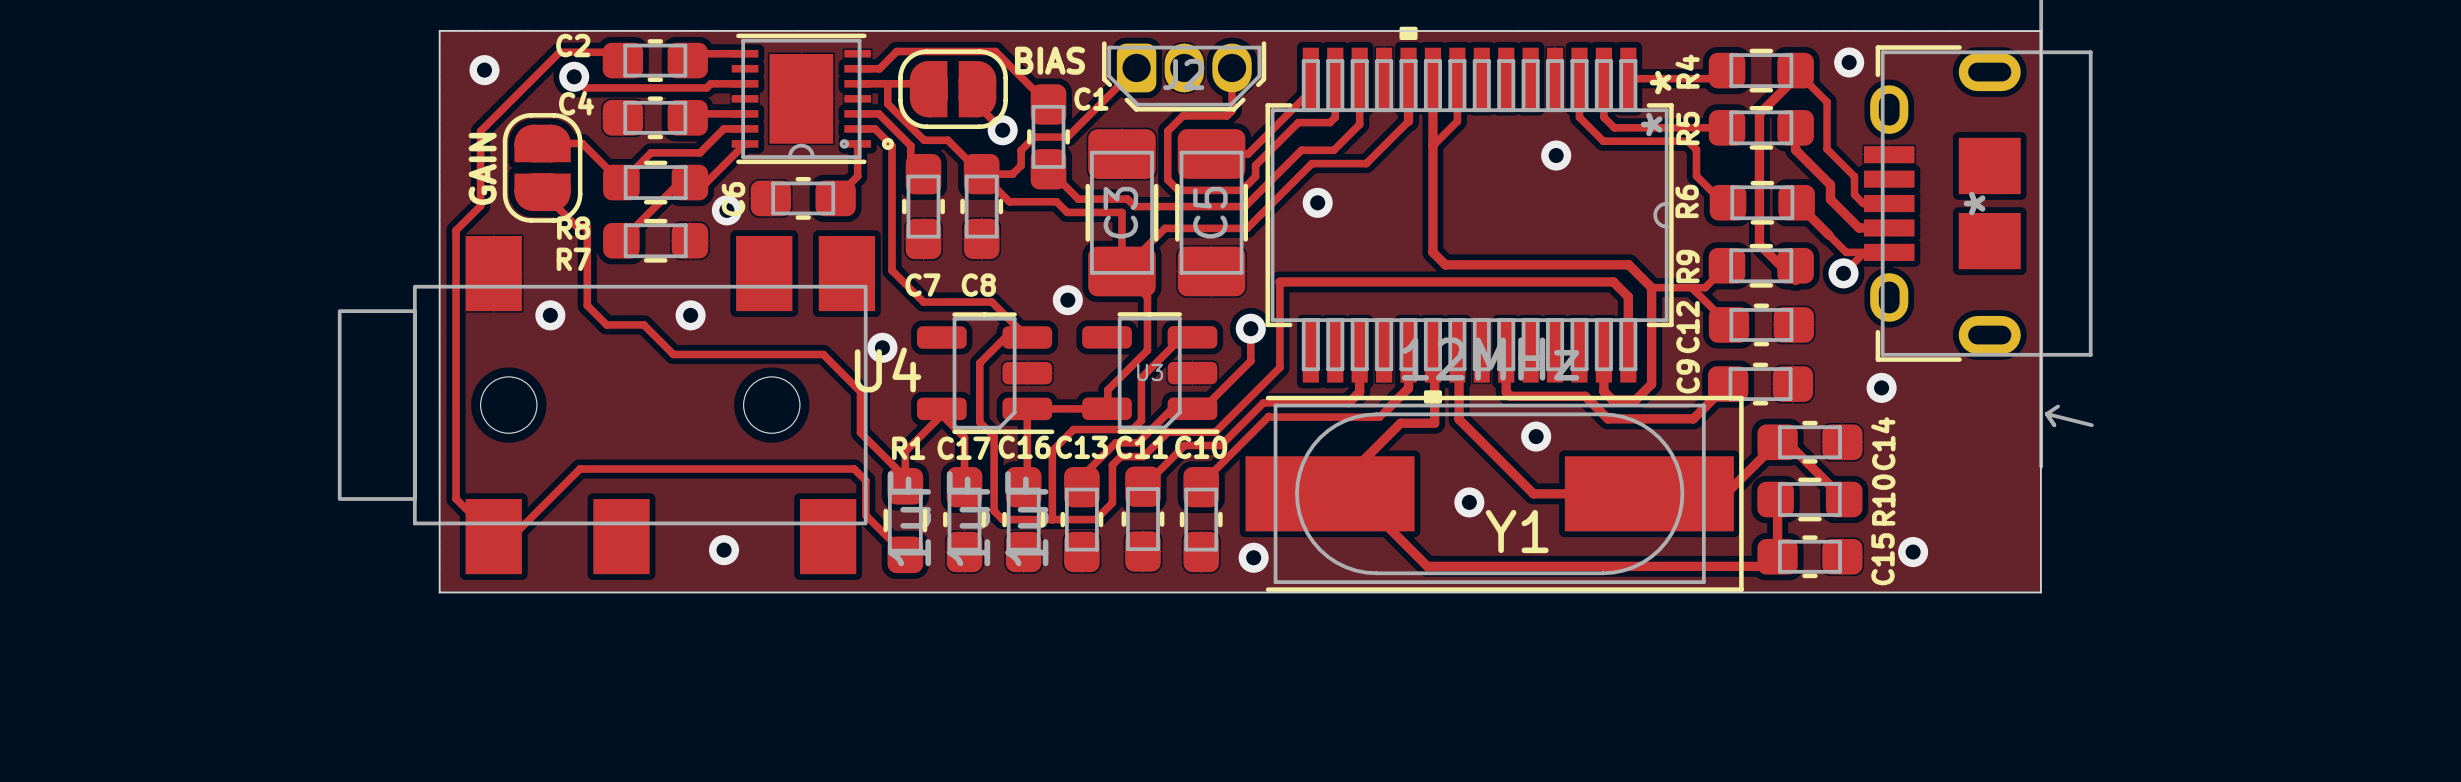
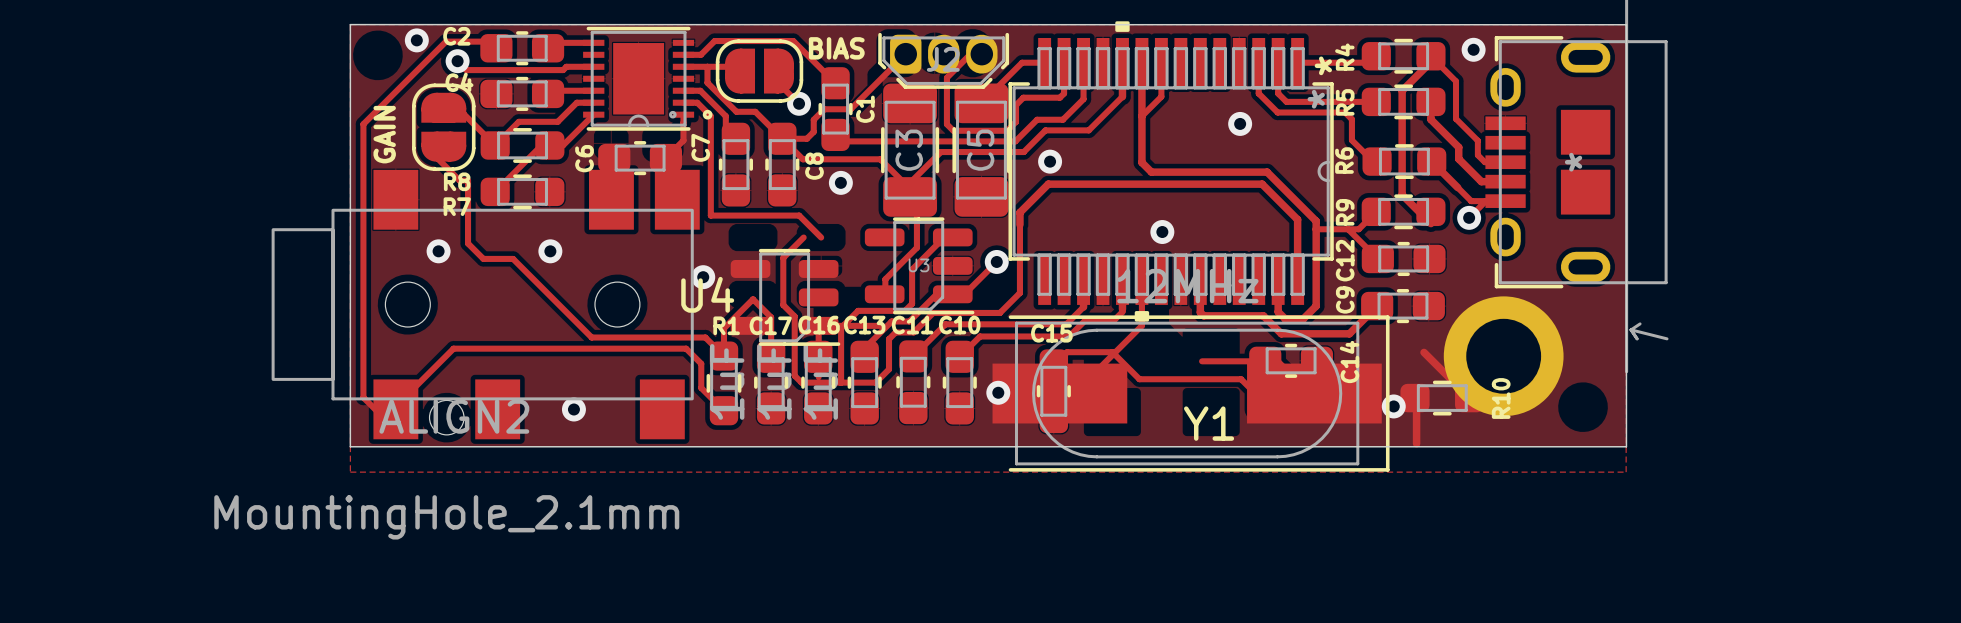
track: (1232, 67) (1232, 110) (1226, 115) (1182, 115) (1167, 131) (1167, 179) (1178, 190) (1241, 190) (1255, 176) (1255, 165) (1298, 122) -> (971, 53) (946, 77) (946, 124) (953, 130) (1007, 130) (1016, 121) (1016, 105) (1023, 97) (1034, 97)
via position: (484, 70) -> (416, 40)
track: none -> (1044, 62) (1022, 62) (981, 103)
track: (1310, 91) (1248, 154) (1211, 154) -> none
C1 name rotation: 0° (1091, 98) -> 90° counterclockwise (865, 109)
track: (480, 131) (480, 205) (456, 230) -> (383, 104) (363, 124) (363, 183)
part position: (542, 167) -> (443, 127)
track: (1048, 169) (1078, 199) (1127, 199) (1135, 206) (1245, 206) (1274, 177) -> (842, 141) (1015, 141)
track: (1284, 190) (1247, 228) (1165, 228) (1121, 271) -> (1023, 152) (940, 152) (910, 182)
track: (1007, 199) (1009, 201) (1056, 201) (1067, 212) (1121, 212) (1121, 271) -> (802, 159) (880, 159) (910, 188)
track: (1432, 204) (1432, 252) (1445, 264) (1628, 264) (1651, 287) -> (1141, 162) (1151, 172) (1267, 172) (1316, 221) (1316, 229)
via: (726, 210) -> none
C3 position: (1121, 212) -> (910, 150)
C5 position: (1211, 212) -> (981, 150)
track: none -> (916, 203) (916, 247) (885, 279) (885, 299)
track: (891, 270) (923, 302) (991, 302) (1027, 337) (1005, 337) (979, 363) (979, 422) (994, 436) (994, 511) (1002, 519) (1095, 519) (1112, 502) (1112, 465) (1120, 456) (1143, 456) (1167, 432) (1215, 432) (1254, 392) -> (803, 237) (783, 257) (783, 305) (794, 316) (794, 375) (801, 382) (875, 382) (889, 369) (889, 339) (895, 332) (913, 332) (933, 312) (999, 312)
track: none -> (710, 215) (799, 215) (821, 237)
track: (1121, 271) (1147, 296) (1147, 350) (1107, 389) (1107, 415) -> none
track: (1279, 281) (1613, 281) (1628, 296) -> (1019, 224) (1019, 212) (1048, 184) (1262, 184) (1297, 219) (1297, 236)
C7 name rotation: 0° (922, 285) -> 90° counterclockwise (700, 147)
C7 name position: C7 (922, 285) -> C7 (700, 147)
C8 name rotation: 0° (978, 285) -> 90° counterclockwise (814, 166)
C8 name position: C8 (978, 285) -> C8 (814, 166)
via: none -> (1162, 232)
via position: (1067, 300) -> (840, 182)
track: (1250, 328) (1250, 361) (1203, 408) -> (996, 261) (964, 294)
track: (1434, 328) (1434, 423) (1400, 423) (1330, 493) -> none
track: (1181, 337) (1141, 377) (1141, 420) (1132, 429) (1073, 429) (1052, 450) (1052, 519) -> (944, 237) (912, 269) (912, 303) (905, 310) (858, 310) (841, 327) (841, 382)
track: (1459, 343) (1459, 419) (1533, 493) (1649, 493) -> none
track: none -> (1141, 280) (1141, 325) (1101, 365)
track: (673, 354) (823, 354) (860, 391) (860, 432) (903, 475) -> (536, 282) (591, 337) (705, 337) (723, 356)
U3 position: (1150, 373) -> (919, 265)
track: (1359, 385) (1359, 392) (1348, 402) (1263, 402) (1220, 445) (1184, 445) (1143, 486) -> (1083, 307) (1066, 324) (945, 324) (913, 356)
via: (1881, 387) -> none
track: (1408, 388) (1379, 417) (1268, 416) (1201, 484) -> (1122, 309) (1122, 311) (1114, 320) (1085, 320) (1069, 336) (980, 336) (959, 356)
part position: (606, 405) -> (485, 304)
track: (1172, 408) (1138, 442) (1115, 442) (1081, 476) -> (936, 294) (909, 321) (891, 321) (864, 348)
via: (1536, 436) -> none
track: (1777, 442) (1726, 493) -> none
C14 position: (1809, 442) -> (1291, 360)
part: none -> (1503, 356)
track: none -> (1202, 361) (1264, 361)
track: none -> (1053, 365) (1067, 352) (1112, 352) (1139, 379) (1241, 379) (1263, 401)
track: (905, 475) (905, 451) (941, 415) (964, 437) (964, 476) -> (723, 347) (723, 328) (753, 299) (771, 317) (771, 348)
track: (1354, 493) (1427, 566) (1768, 566) -> none
via: (1469, 502) -> none
via: none -> (1393, 406)
track: none -> (392, 409) (453, 348) (686, 348) (701, 363) (701, 388) (723, 410)
C17 position: (964, 519) -> (771, 382)
C16 position: (1023, 519) -> (818, 382)
C13 position: (1081, 519) -> (864, 382)
C11 position: (1142, 519) -> (913, 382)
C10 position: (1201, 519) -> (959, 382)
R1 position: (905, 520) -> (723, 383)
ALIGN2: none -> MountingHole_2.1mm (446, 417)
track: (512, 536) (579, 469) (854, 469) (865, 480) (865, 515) (905, 554) -> none
via position: (724, 550) -> (573, 409)
via: (1913, 552) -> none
C15 rotation: 0° (1809, 556) -> 90° clockwise (1053, 391)
C15 position: (1809, 556) -> (1053, 391)
via position: (1253, 557) -> (998, 392)
C15 name position: C15 (1882, 559) -> C15 (1051, 333)
board edge: (439, 560) (439, 592) (2040, 592) (2040, 560) -> (350, 446) (1626, 446)

